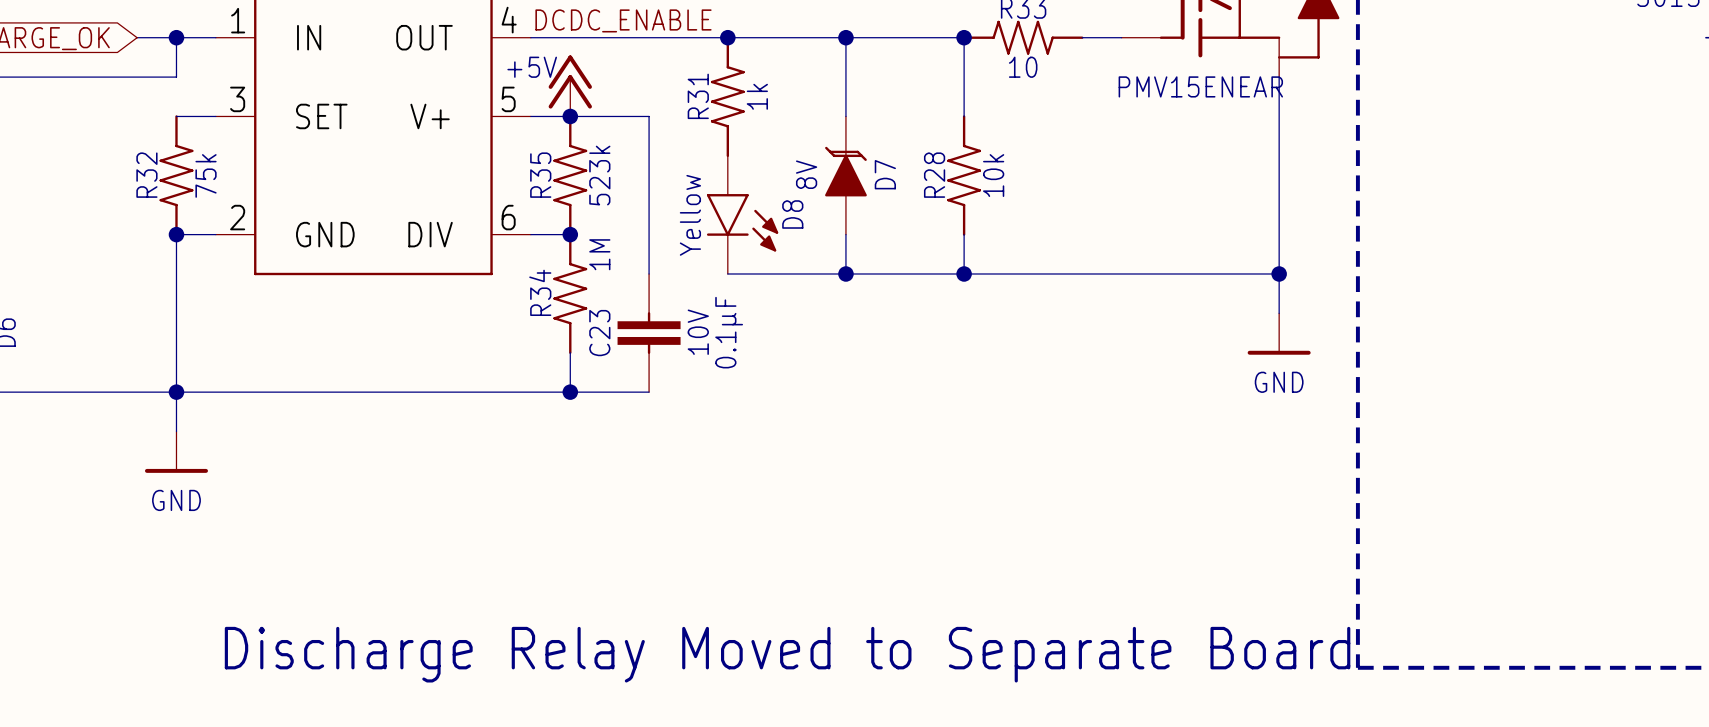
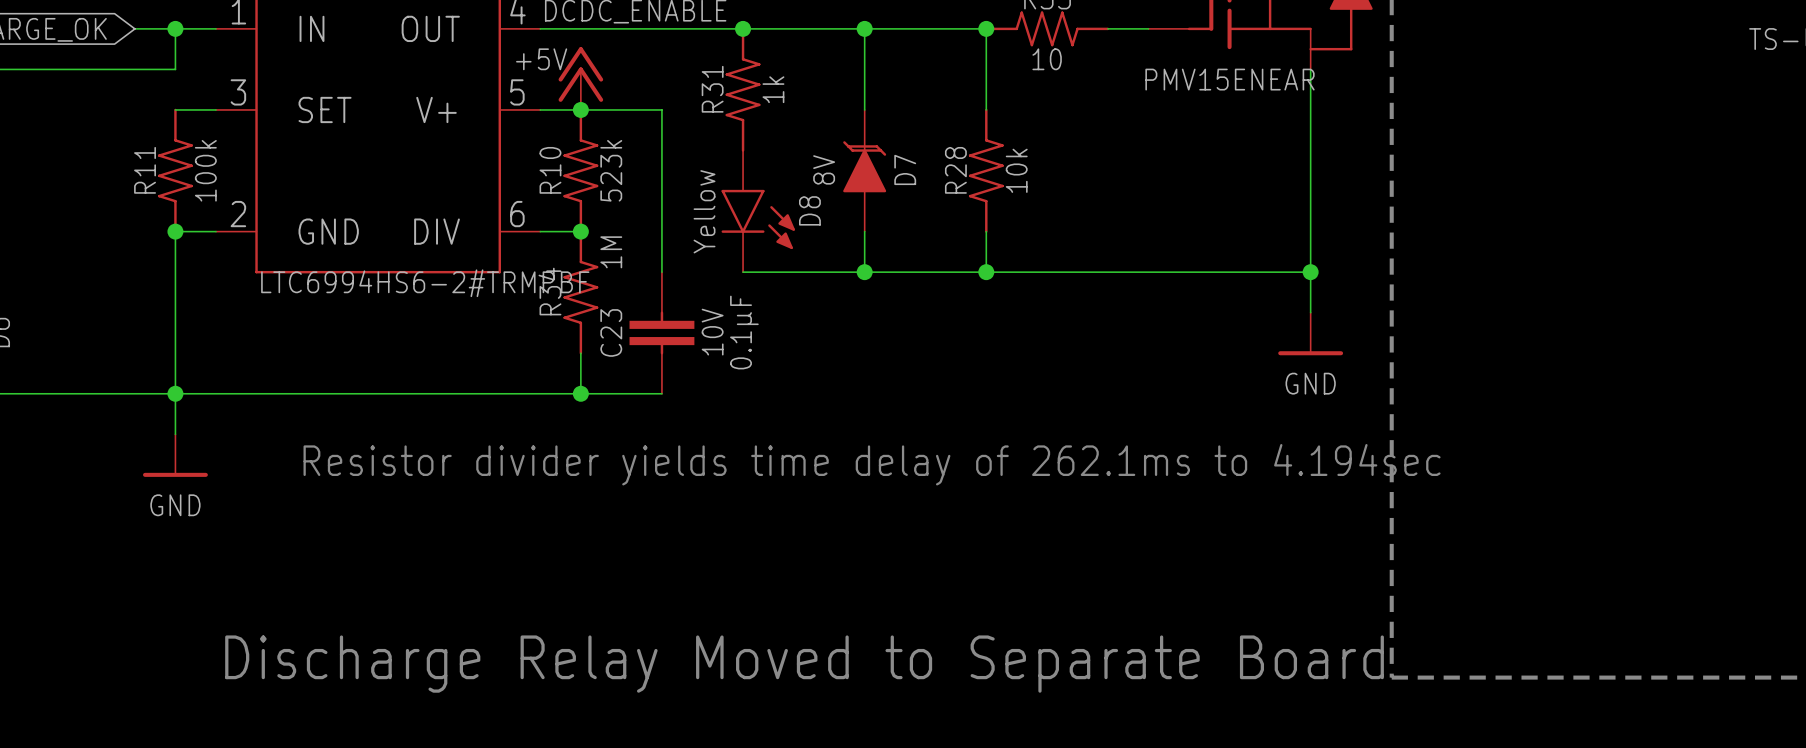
R32 name: R32 (146, 175) -> R11 (145, 170)
R32 text: 75k (206, 175) -> 100k (205, 170)
R35 name: R35 (540, 175) -> R10 (550, 170)
part text: none -> LTC6994HS6-2#TRMPBF (425, 283)
text: none -> Resistor divider yields time delay of 262.1ms to 4.194sec (872, 464)

